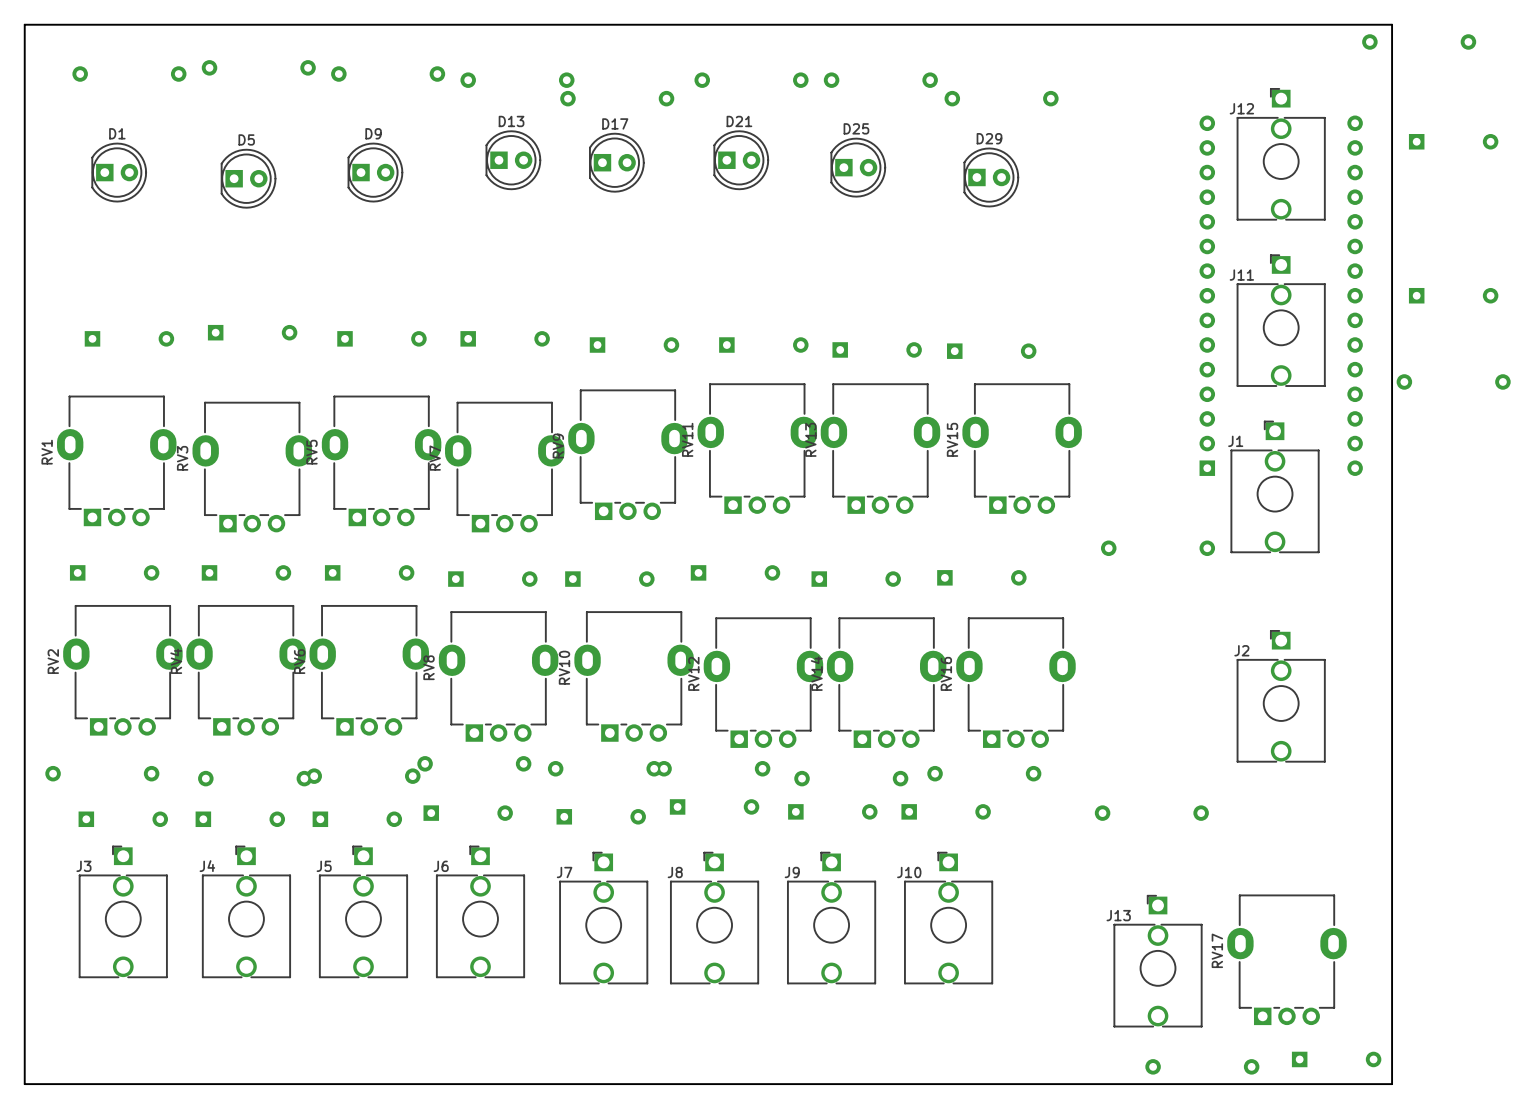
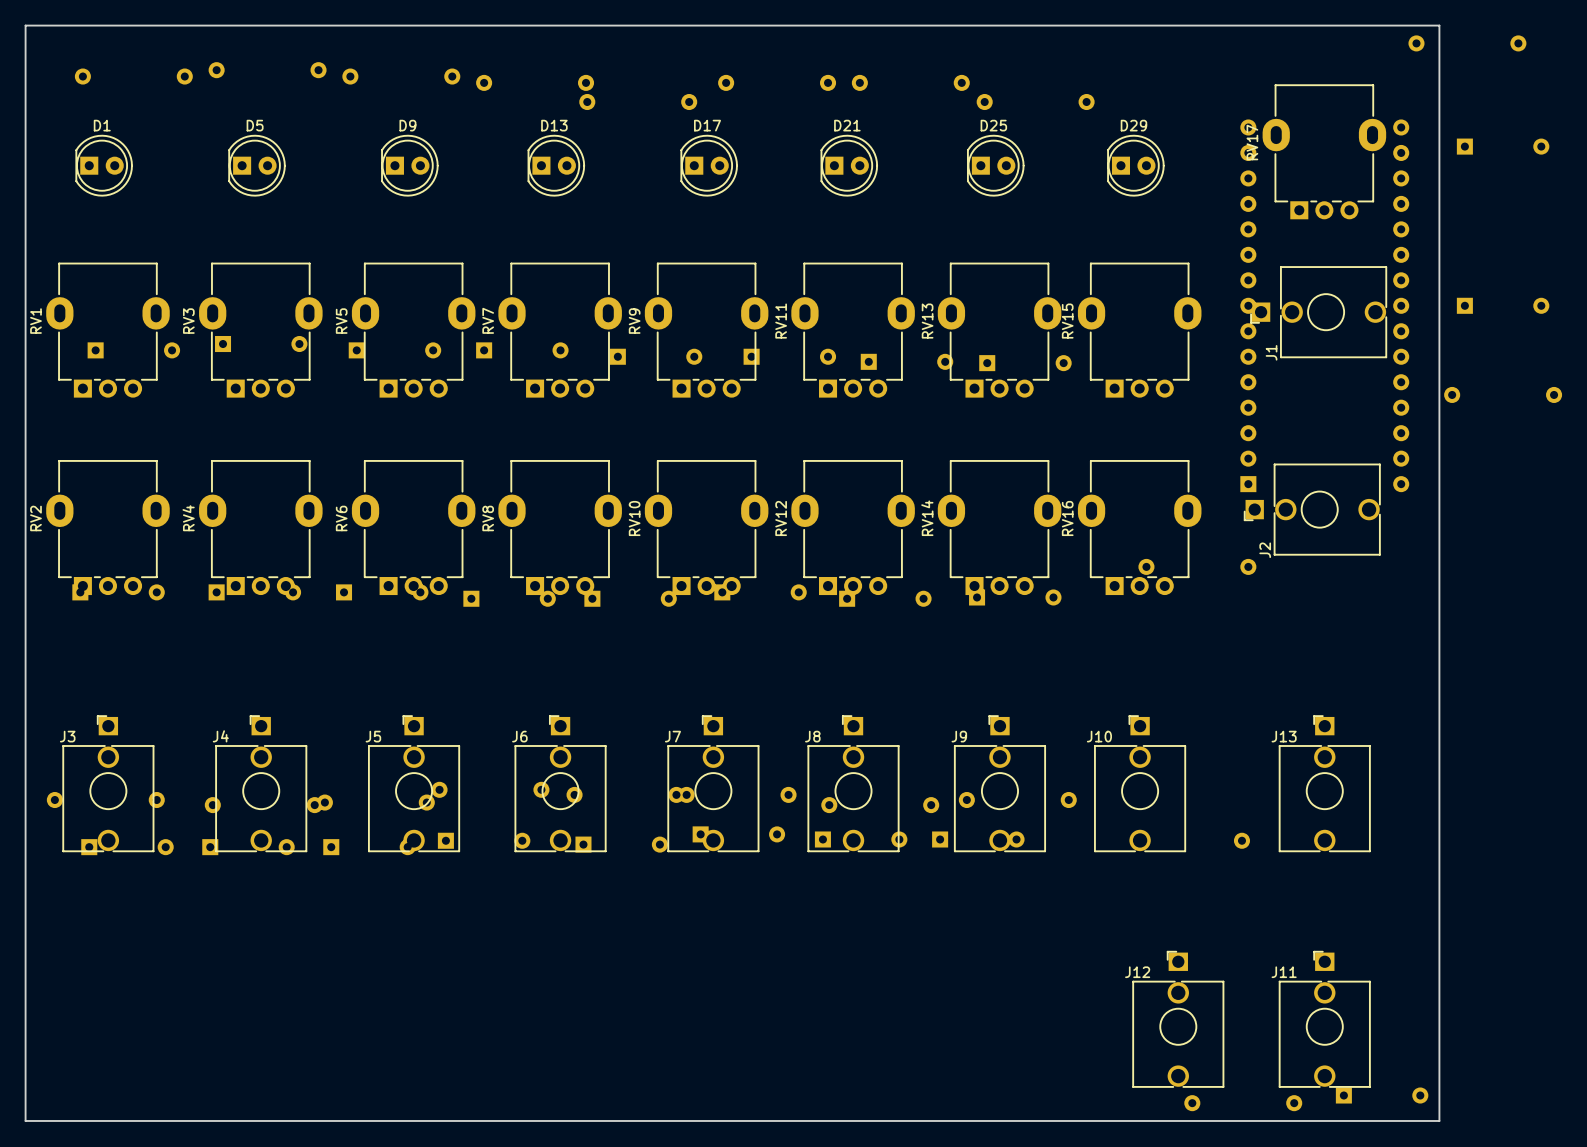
D5 footprint: [221, 149, 277, 209] -> [228, 135, 286, 197]
J12 position: (1281, 154) -> (1178, 1019)
D13 position: (513, 160) -> (556, 165)
D21 position: (741, 160) -> (849, 165)
D17 position: (616, 162) -> (709, 165)
D25 position: (858, 167) -> (995, 165)
D1 position: (119, 172) -> (104, 165)
D9 position: (375, 172) -> (409, 165)
D29 position: (991, 177) -> (1135, 165)
J11 position: (1281, 320) -> (1324, 1019)
RV11 position: (757, 448) -> (853, 330)
RV13 position: (880, 448) -> (999, 330)
RV15 position: (1022, 448) -> (1139, 330)
RV9 position: (627, 454) -> (706, 330)
RV1 position: (116, 461) -> (107, 330)
RV5 position: (381, 461) -> (413, 330)
RV3 position: (252, 467) -> (260, 330)
RV7 position: (504, 467) -> (560, 330)
J1 rotation: 0° (1275, 486) -> 90° counterclockwise (1318, 312)
J1 position: (1275, 486) -> (1318, 312)
RV2 position: (122, 670) -> (107, 527)
RV4 position: (246, 670) -> (260, 527)
RV6 position: (369, 670) -> (413, 527)
RV8 position: (498, 676) -> (560, 527)
RV10 position: (634, 676) -> (706, 527)
RV12 position: (763, 682) -> (853, 527)
RV14 position: (886, 682) -> (999, 527)
RV16 position: (1015, 682) -> (1139, 527)
J2 rotation: 0° (1281, 696) -> 90° counterclockwise (1312, 509)
J2 position: (1281, 696) -> (1312, 509)
J3 position: (123, 911) -> (108, 783)
J4 position: (246, 911) -> (261, 783)
J5 position: (363, 911) -> (414, 783)
J6 position: (480, 911) -> (560, 783)
J7 position: (603, 918) -> (713, 783)
J8 position: (714, 918) -> (853, 783)
J9 position: (831, 918) -> (999, 783)
J10 position: (948, 918) -> (1140, 783)
RV17 position: (1286, 959) -> (1324, 151)
J13 position: (1158, 961) -> (1324, 783)

